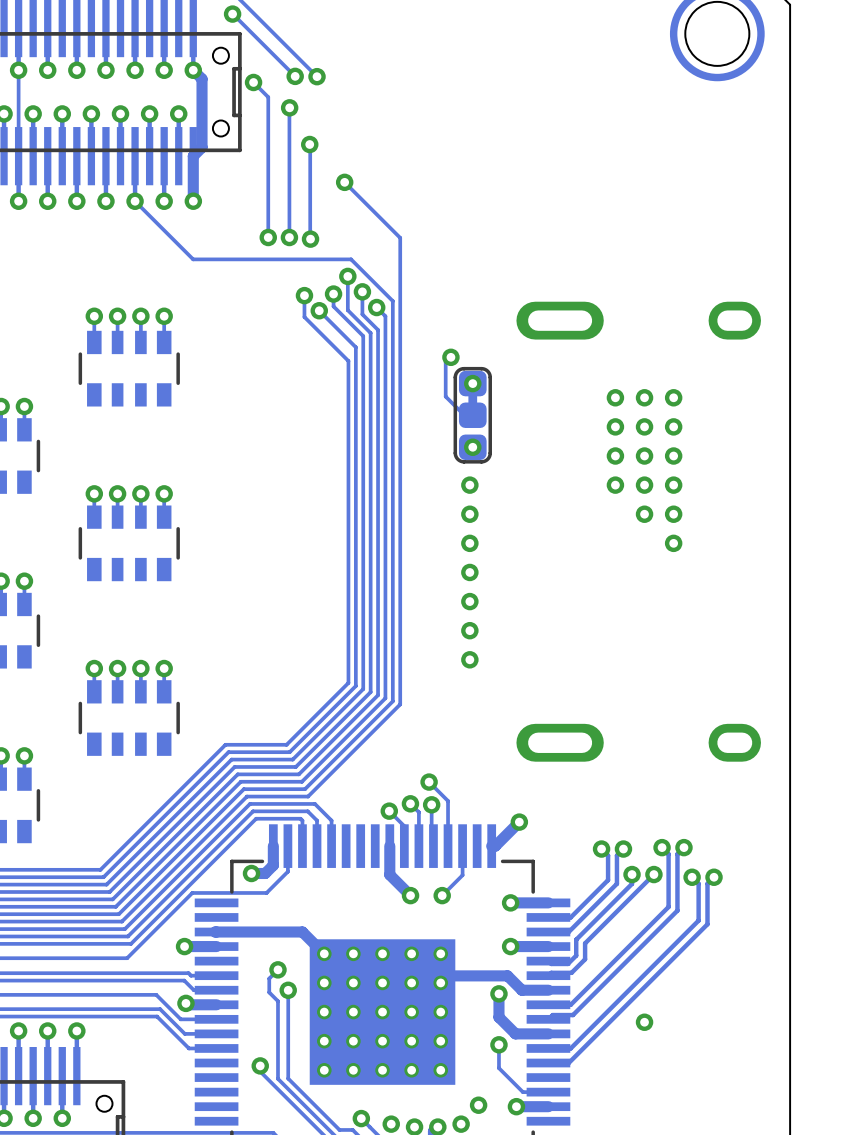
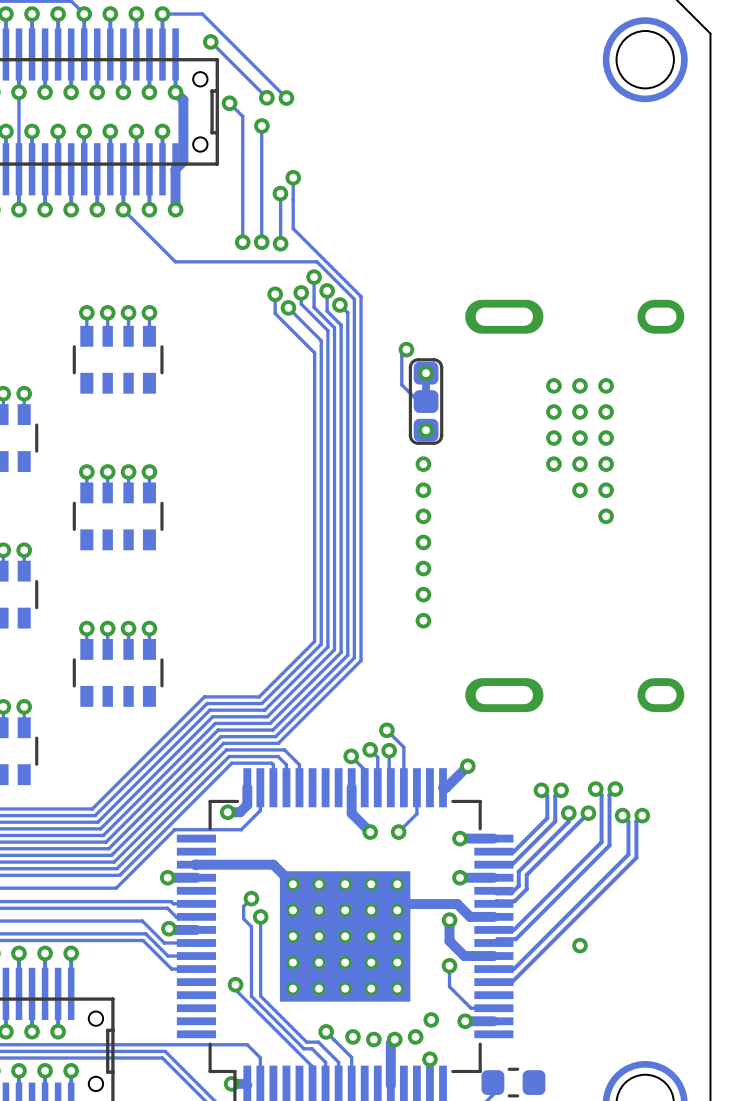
track: (309, 144) (310, 238) -> (280, 193) (280, 243)
via: (309, 144) -> none
via: none -> (293, 177)
track: (344, 182) (400, 237) (400, 298) -> (293, 177) (293, 228) (361, 296)
via: (344, 182) -> none
via: none -> (280, 193)

